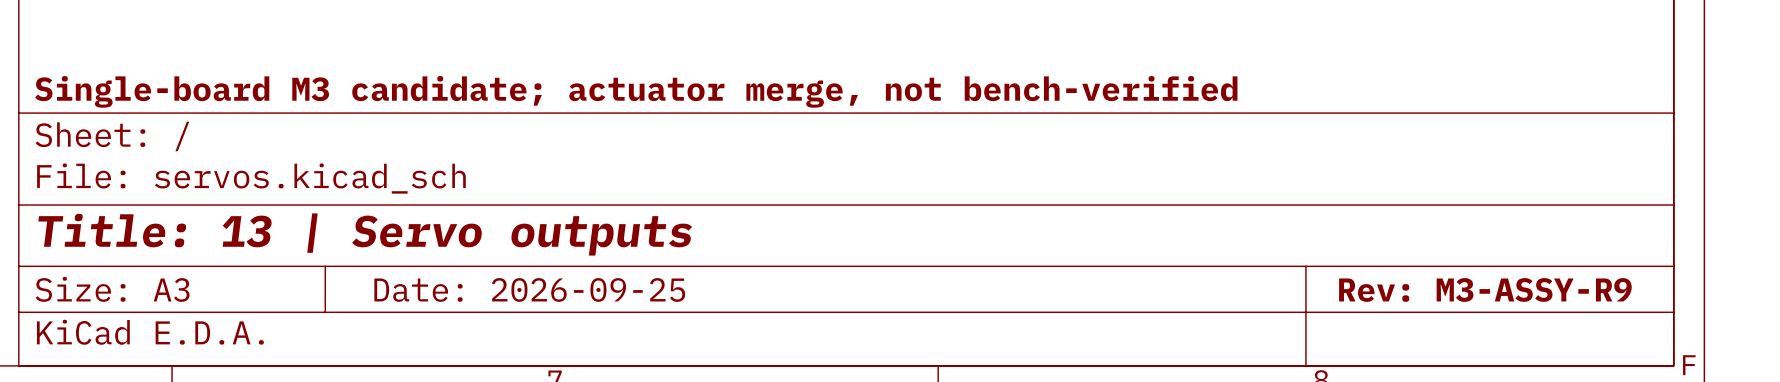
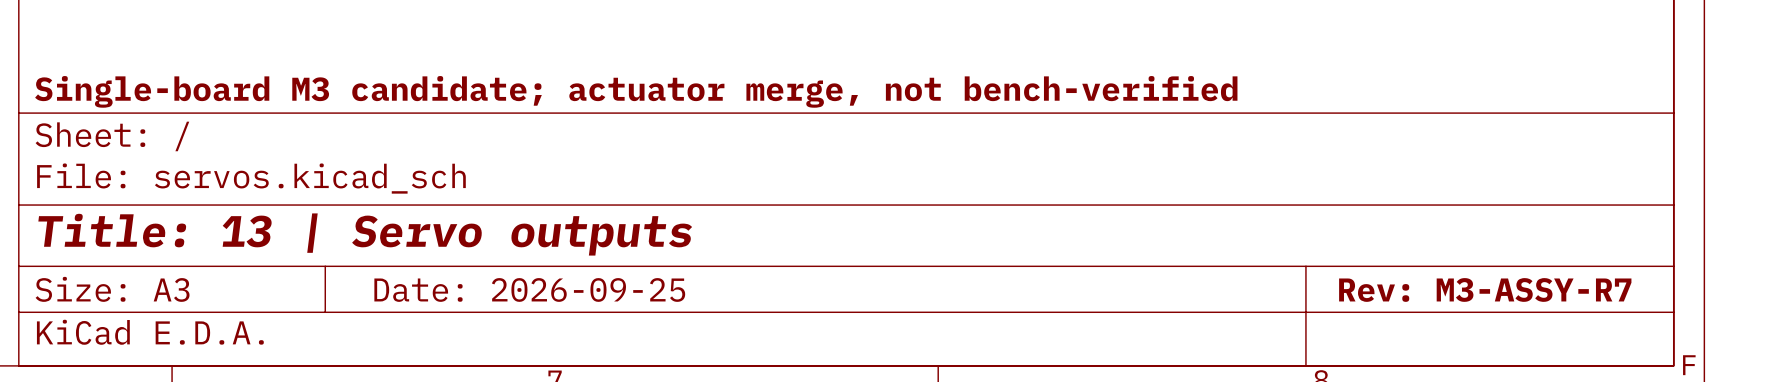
title block: Rev: M3-ASSY-R9 (1485, 289) -> Rev: M3-ASSY-R7 (1485, 289)

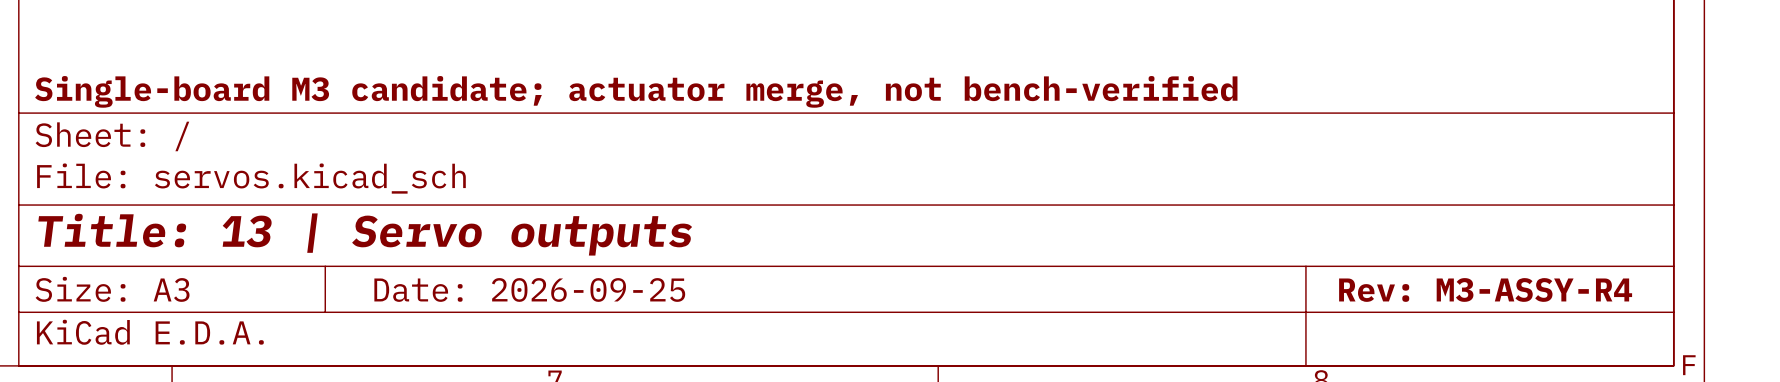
title block: Rev: M3-ASSY-R7 (1485, 289) -> Rev: M3-ASSY-R4 (1485, 289)

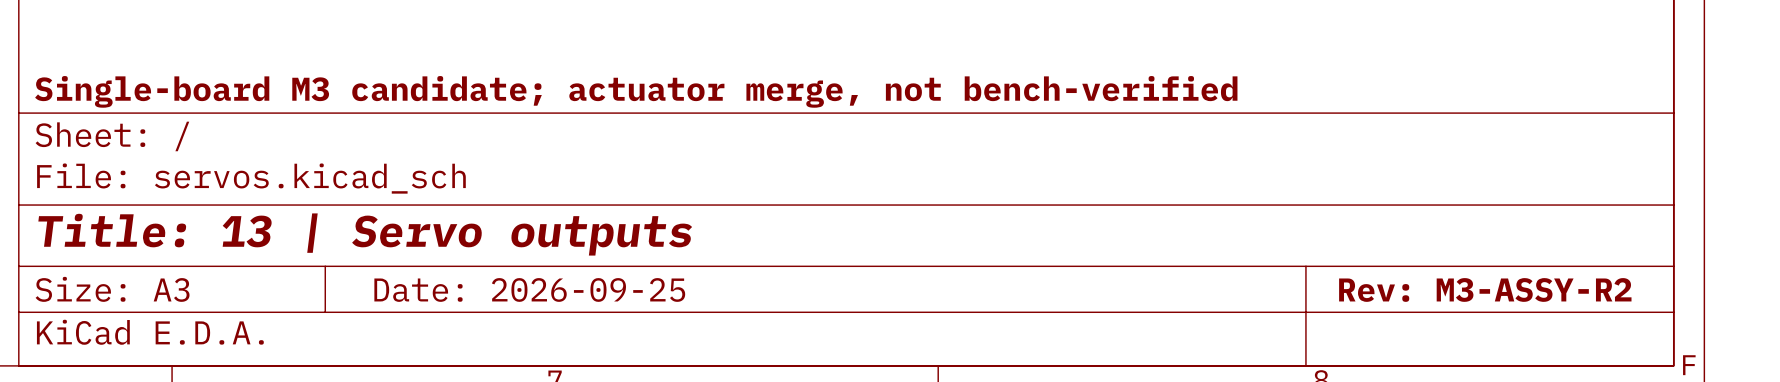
title block: Rev: M3-ASSY-R4 (1485, 289) -> Rev: M3-ASSY-R2 (1485, 289)

